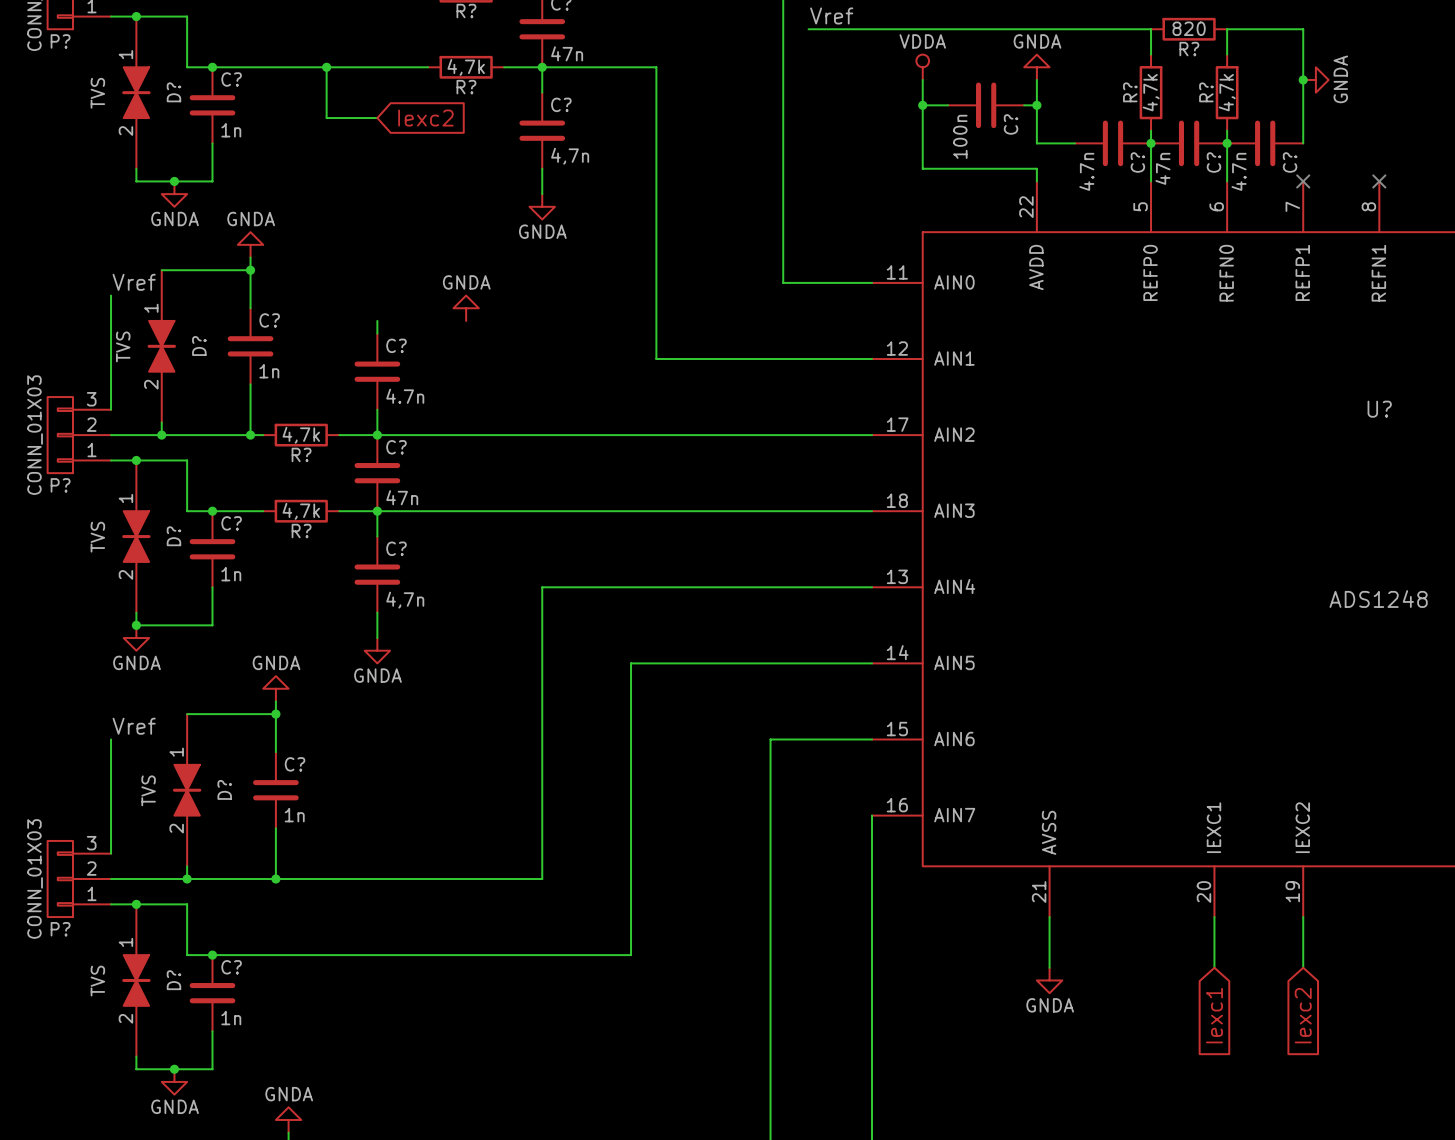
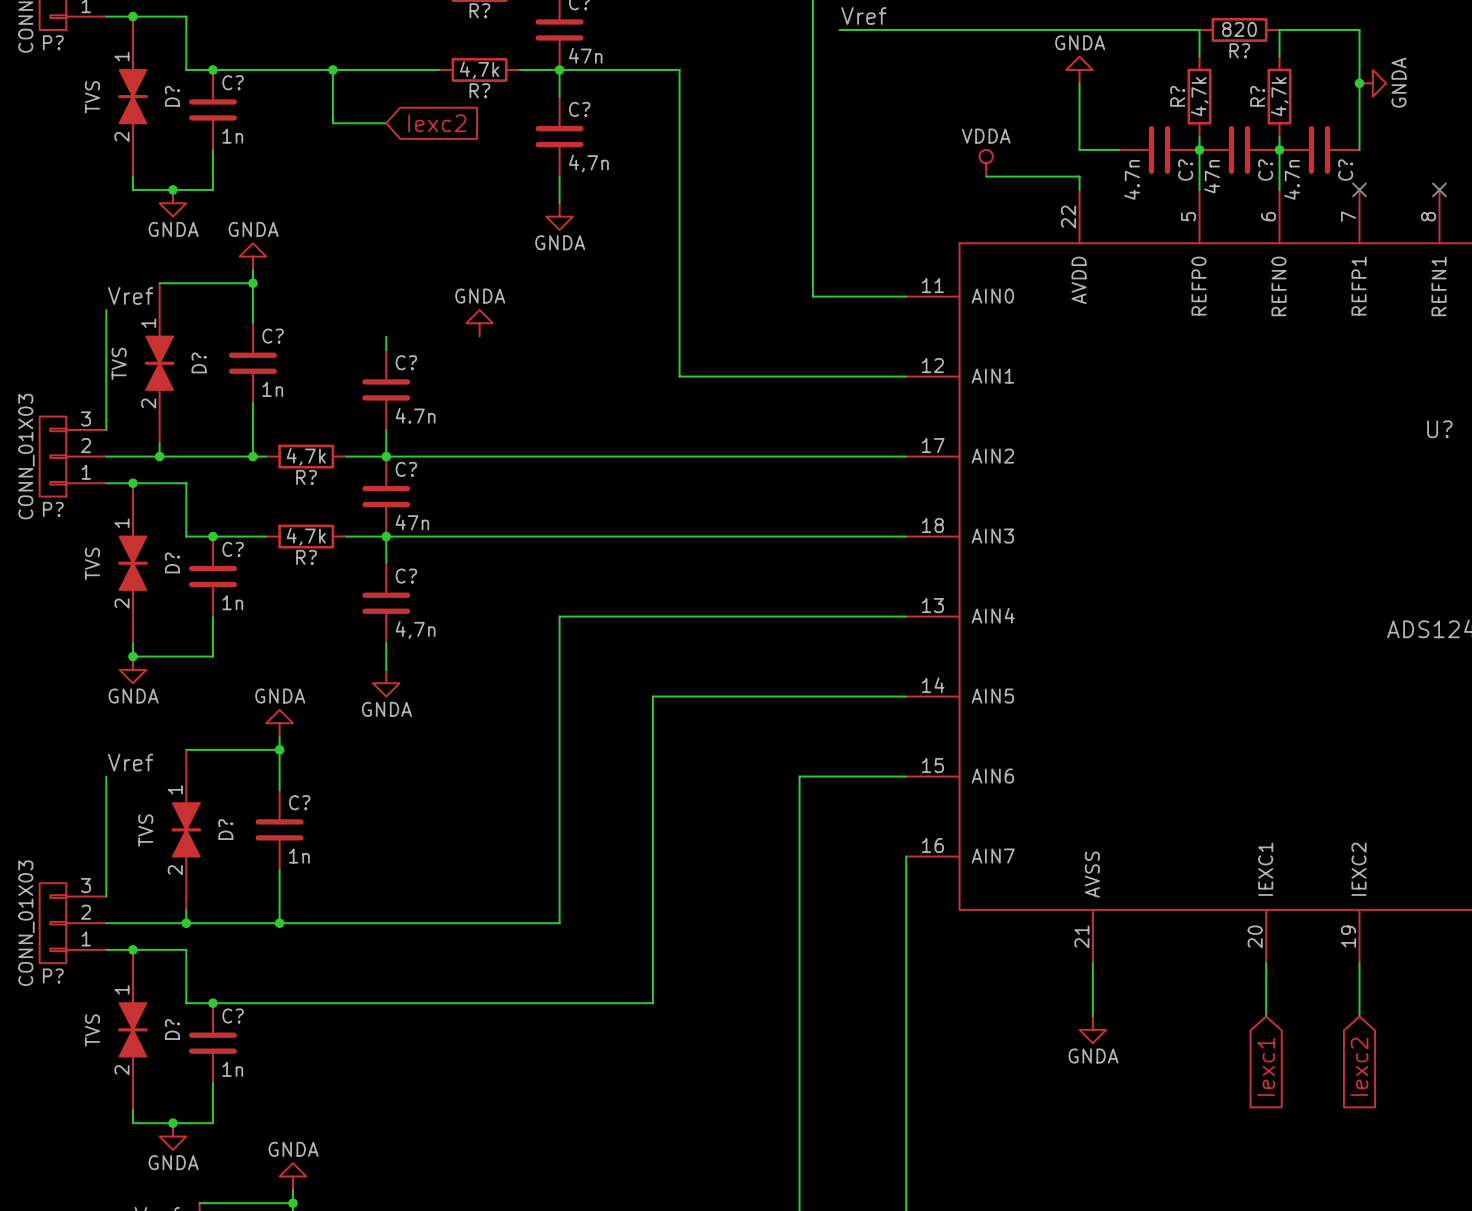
power symbol position: VDDA (922, 67) -> VDDA (986, 163)
wire: (922, 79) (922, 168) (948, 168) -> none
wire: (922, 105) (948, 105) -> none
junction: (922, 105) -> none
C?: 100n (986, 105) -> none
wire: (1024, 105) (1036, 105) -> none
junction: (1036, 105) -> none

